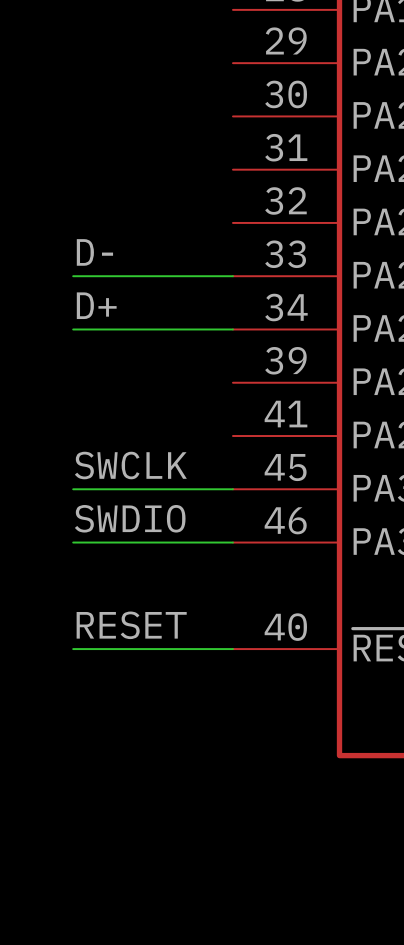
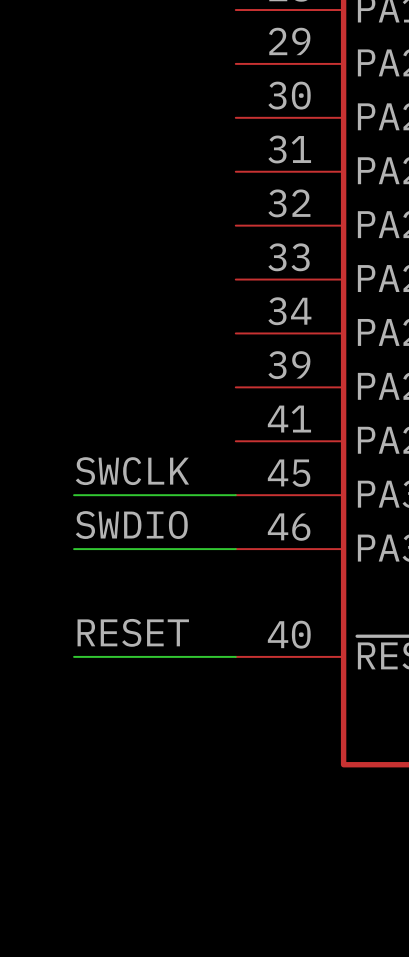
label: D- (94, 252) -> none
wire: (73, 276) (232, 276) -> none
label: D+ (96, 305) -> none
wire: (73, 329) (232, 329) -> none

